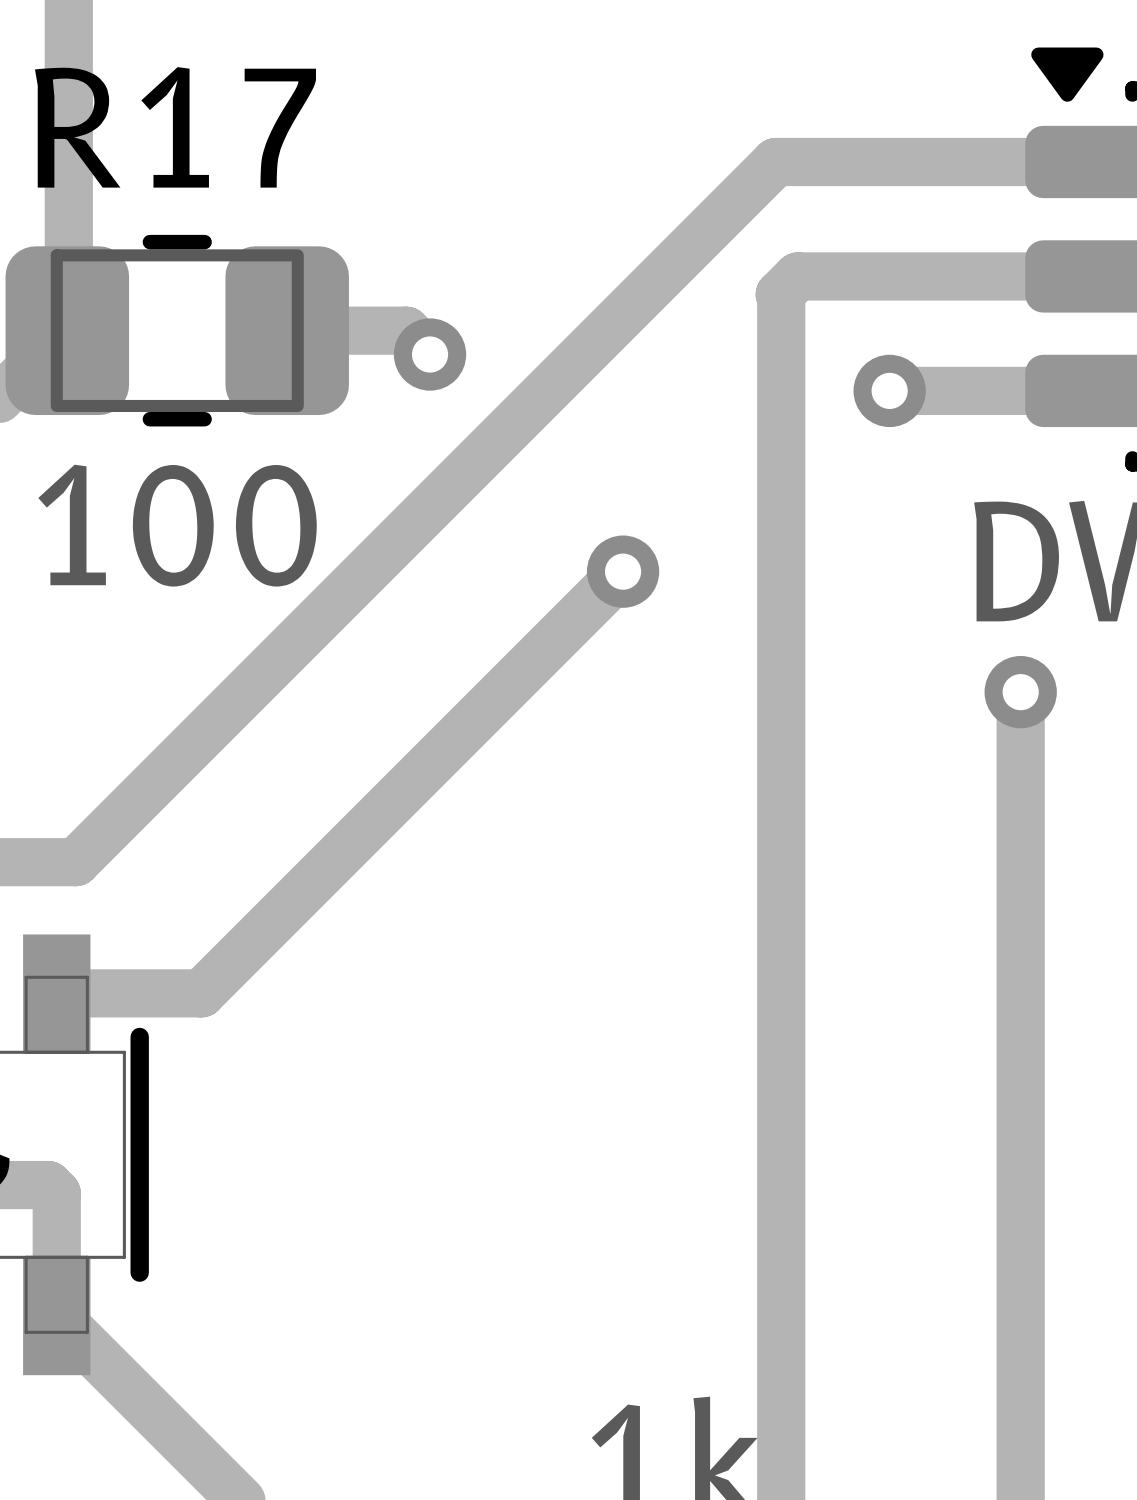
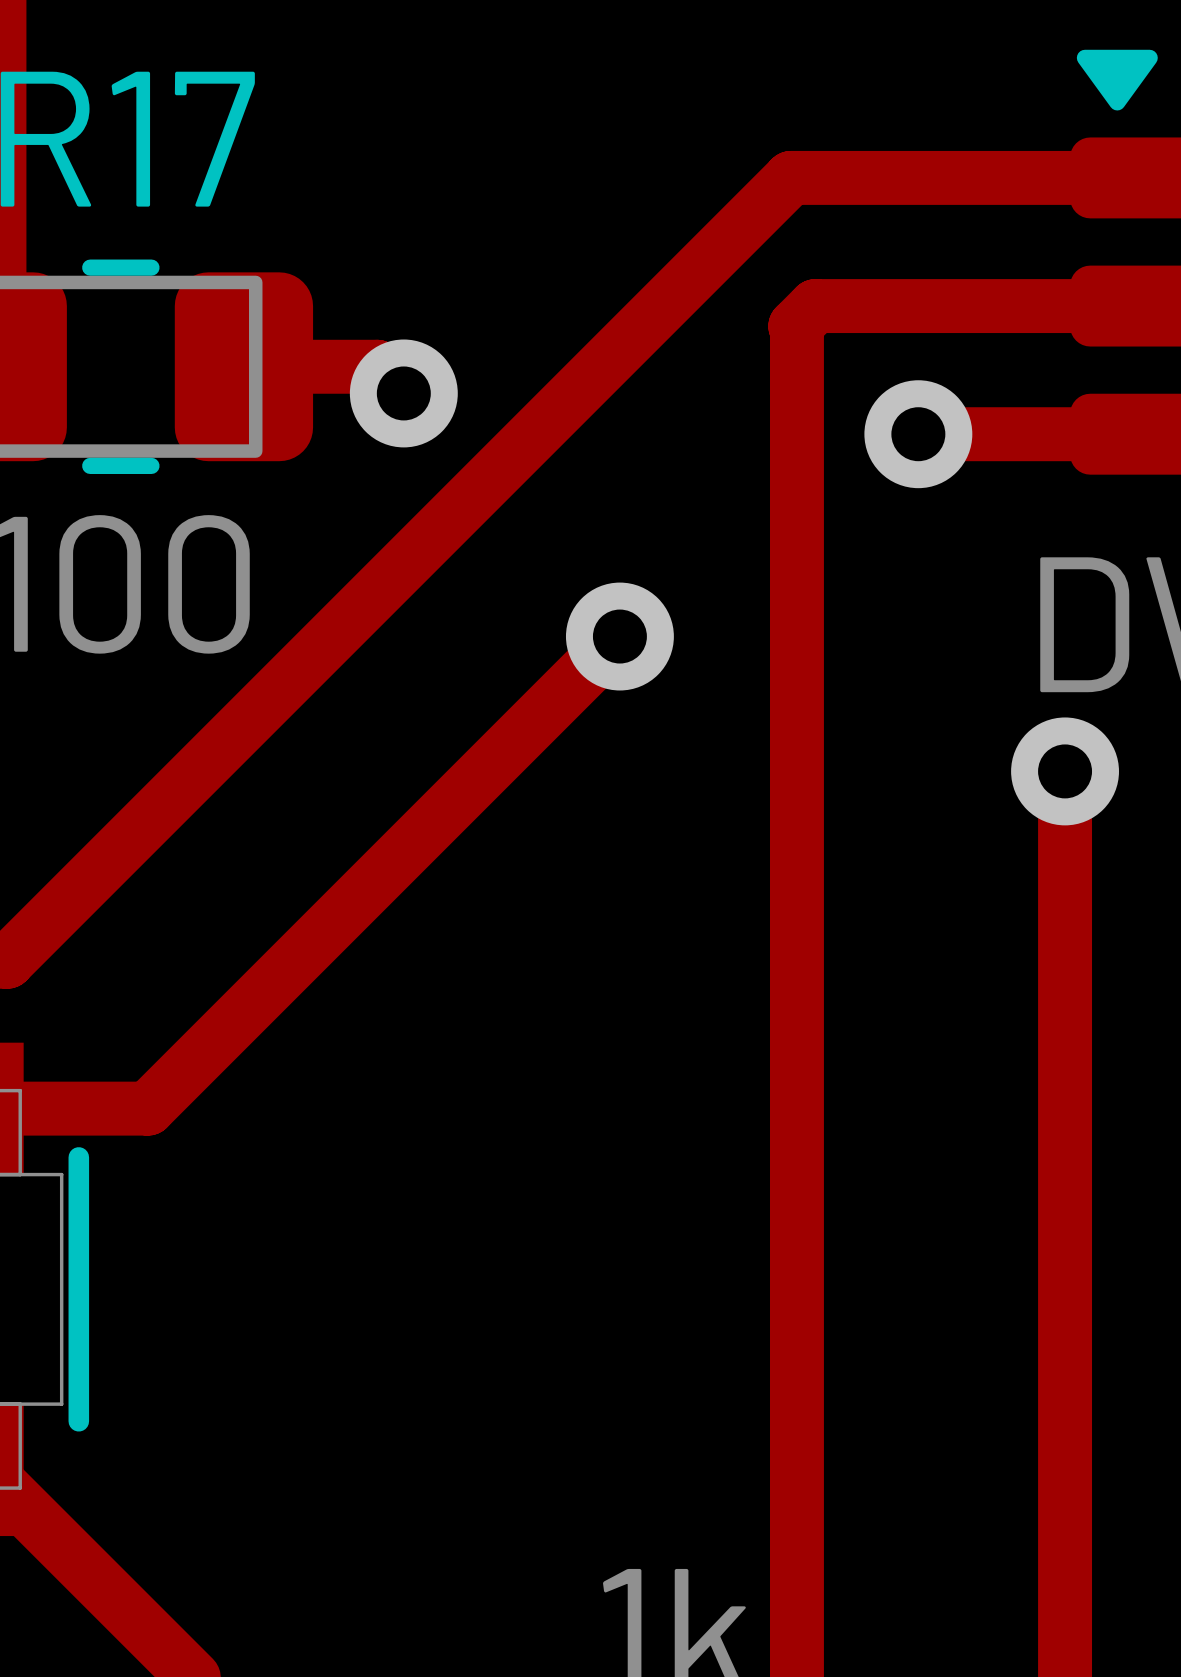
via size: [393, 318, 467, 391] -> [349, 339, 458, 448]
via size: [853, 354, 926, 428] -> [864, 380, 973, 489]
via size: [586, 535, 660, 608] -> [565, 582, 674, 691]
via size: [984, 656, 1057, 729] -> [1011, 717, 1120, 826]

